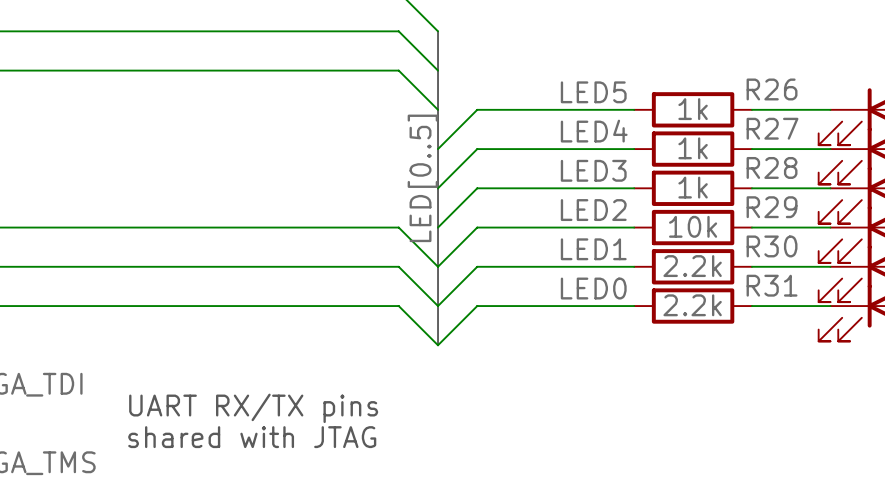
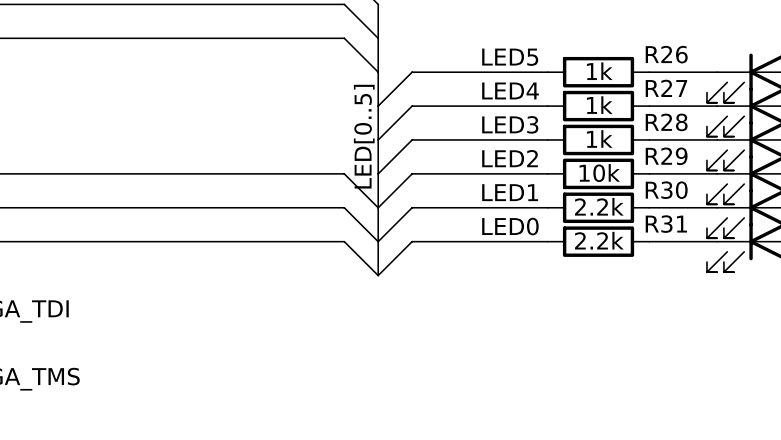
text: UART RX/TX pins (253, 408) -> none
text: shared with JTAG (252, 437) -> none

